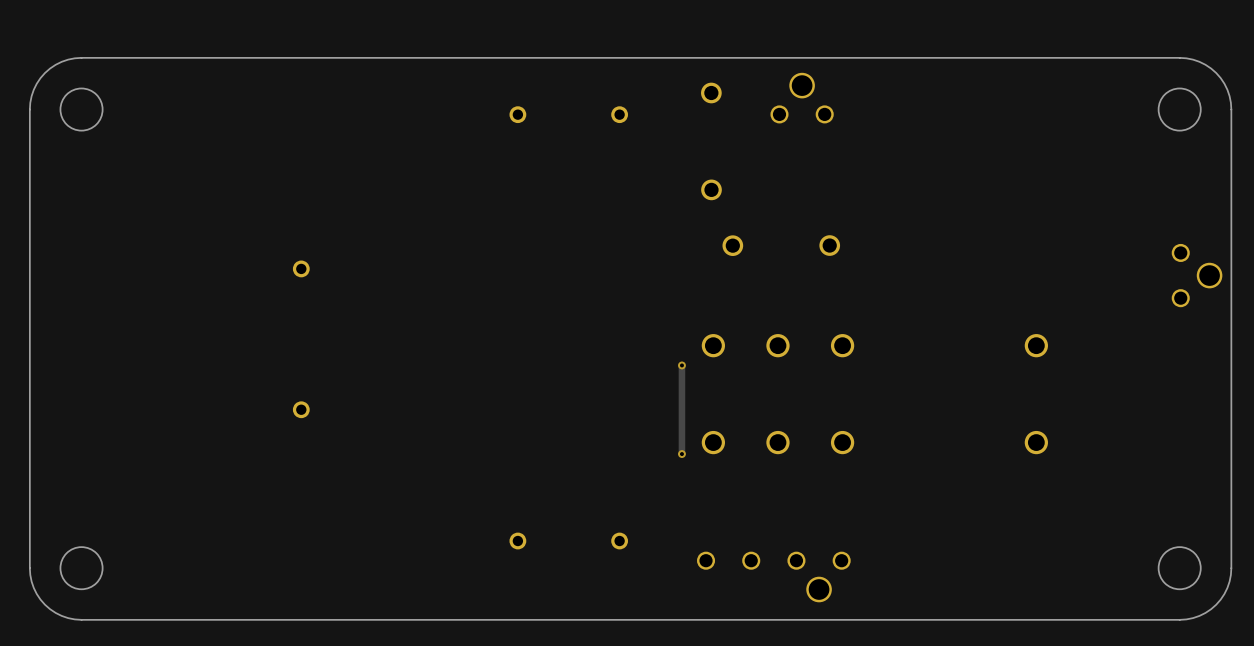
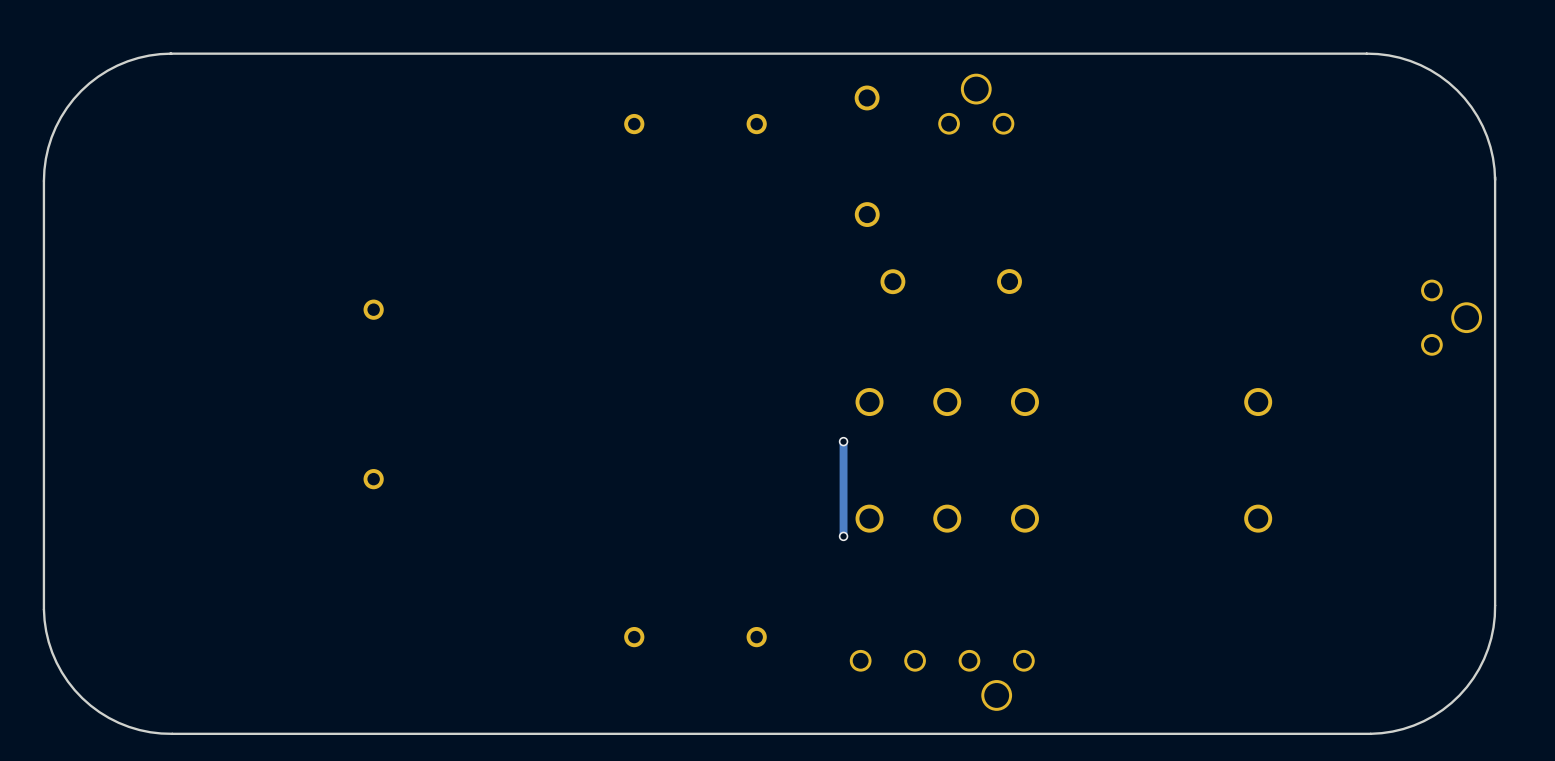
board edge: none -> (170, 53) (1377, 54) (1410, 61) (1430, 70) (1448, 82) (1464, 98) (1477, 116) (1487, 136) (1493, 157) (1495, 180)
board edge: none -> (171, 53) (149, 55) (127, 61) (107, 70) (81, 90) (66, 107) (51, 137) (45, 158) (43, 181) (43, 609) (46, 631) (52, 652) (61, 672) (82, 698) (99, 712) (118, 722) (139, 730) (161, 733) (1370, 733) (1392, 731) (1413, 725) (1442, 709) (1466, 687) (1484, 659) (1493, 627) (1495, 177)
board edge: (1179, 57) (81, 57) (61, 61) (50, 68) (36, 83) (31, 96) (29, 109) (29, 568) (33, 587) (40, 599) (50, 609) (68, 618) (81, 619) (1179, 619) (1199, 615) (1211, 609) (1220, 599) (1229, 581) (1231, 568) (1231, 109) (1227, 89) (1216, 73) (1199, 61) (1179, 57) -> none
round board edge: [59, 87, 104, 132] -> none
round board edge: [1157, 87, 1202, 132] -> none
track: (681, 365) (681, 454) -> none
via: (681, 365) -> none
track: none -> (843, 441) (843, 536)
via: none -> (843, 441)
via: (681, 454) -> none
via: none -> (843, 536)
round board edge: [59, 546, 104, 590] -> none
round board edge: [1157, 546, 1202, 590] -> none

